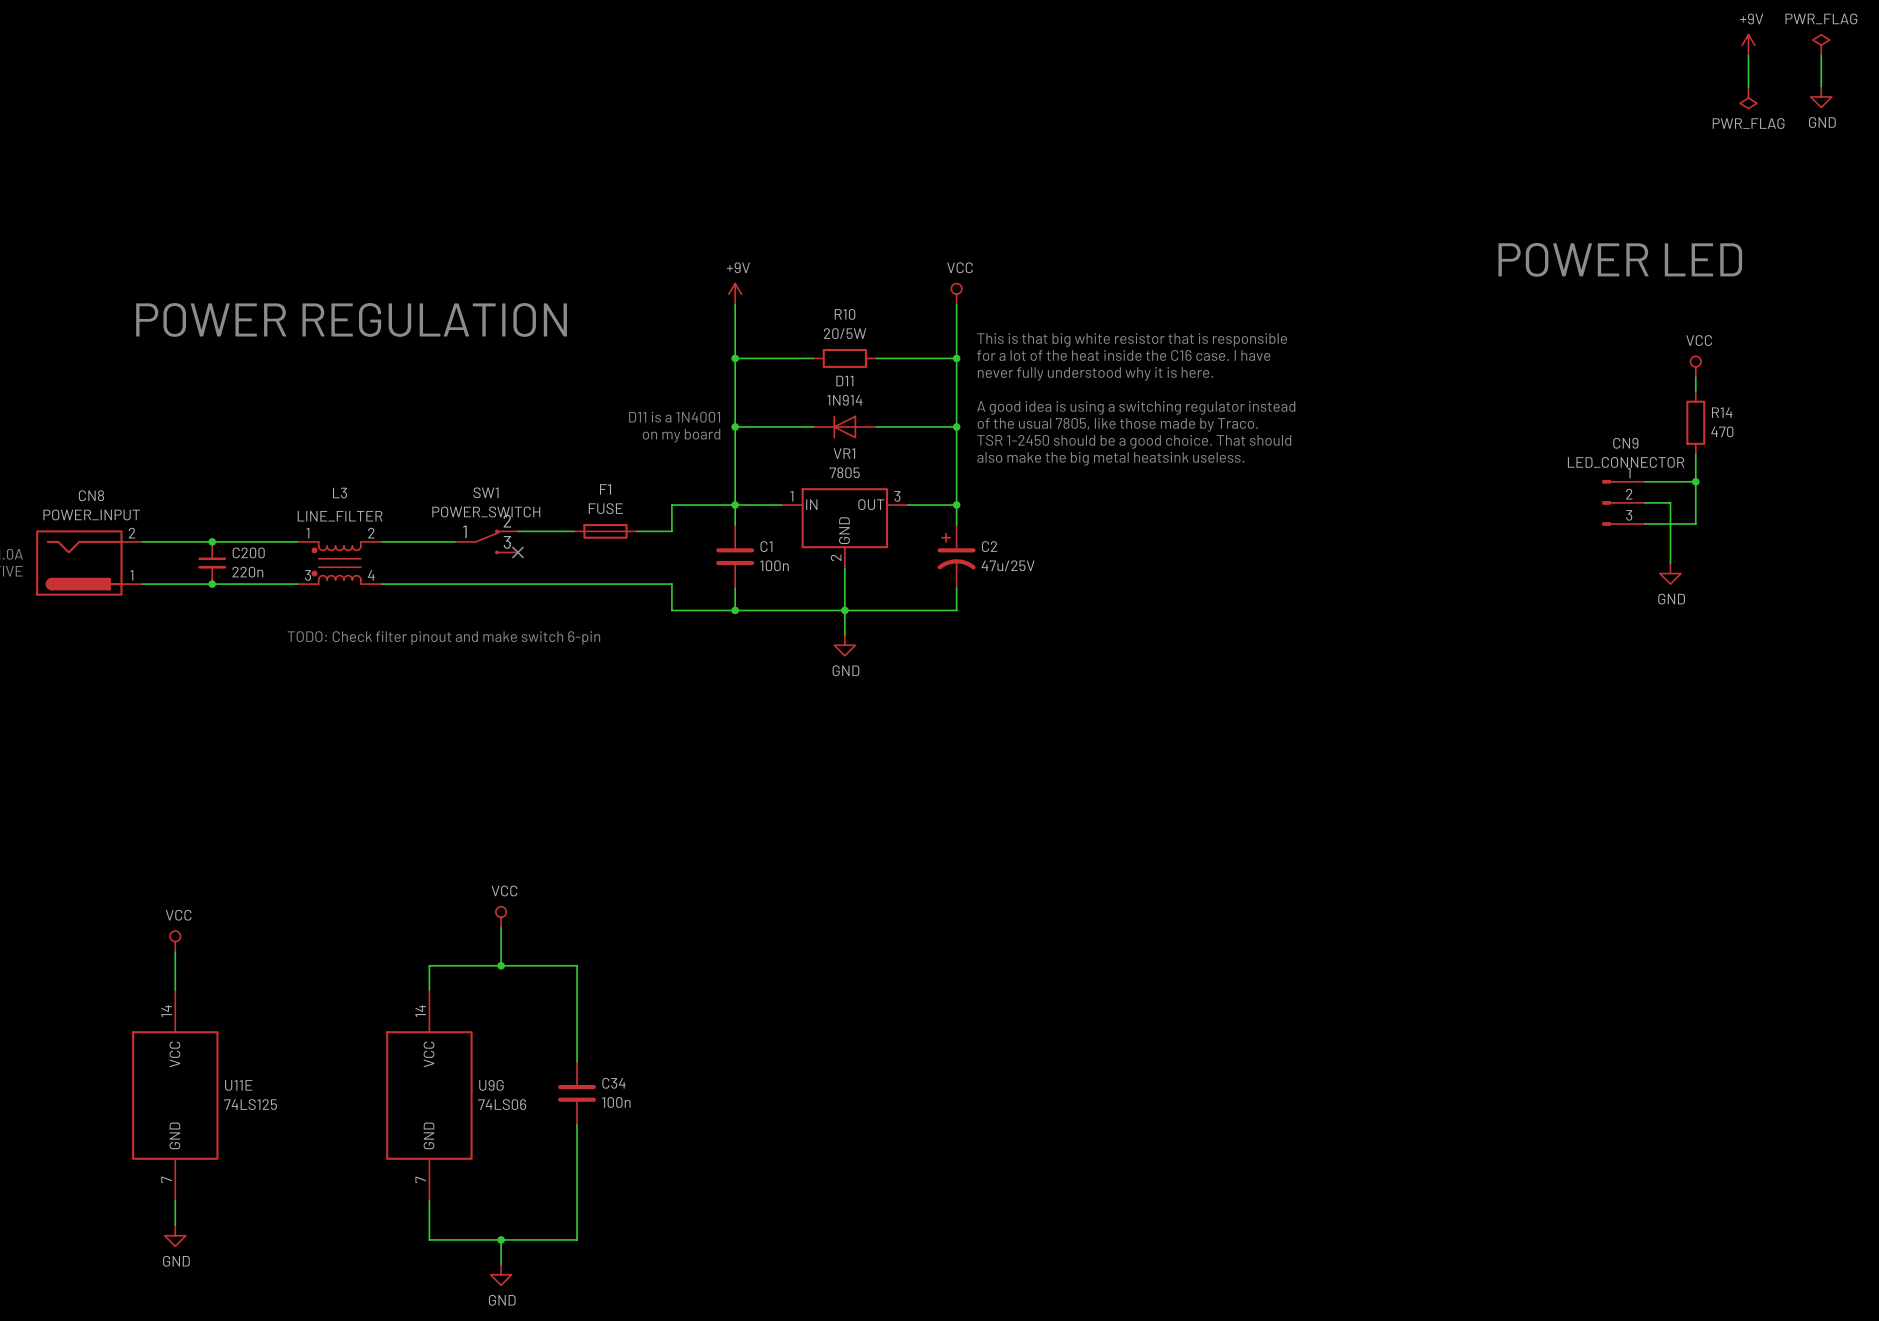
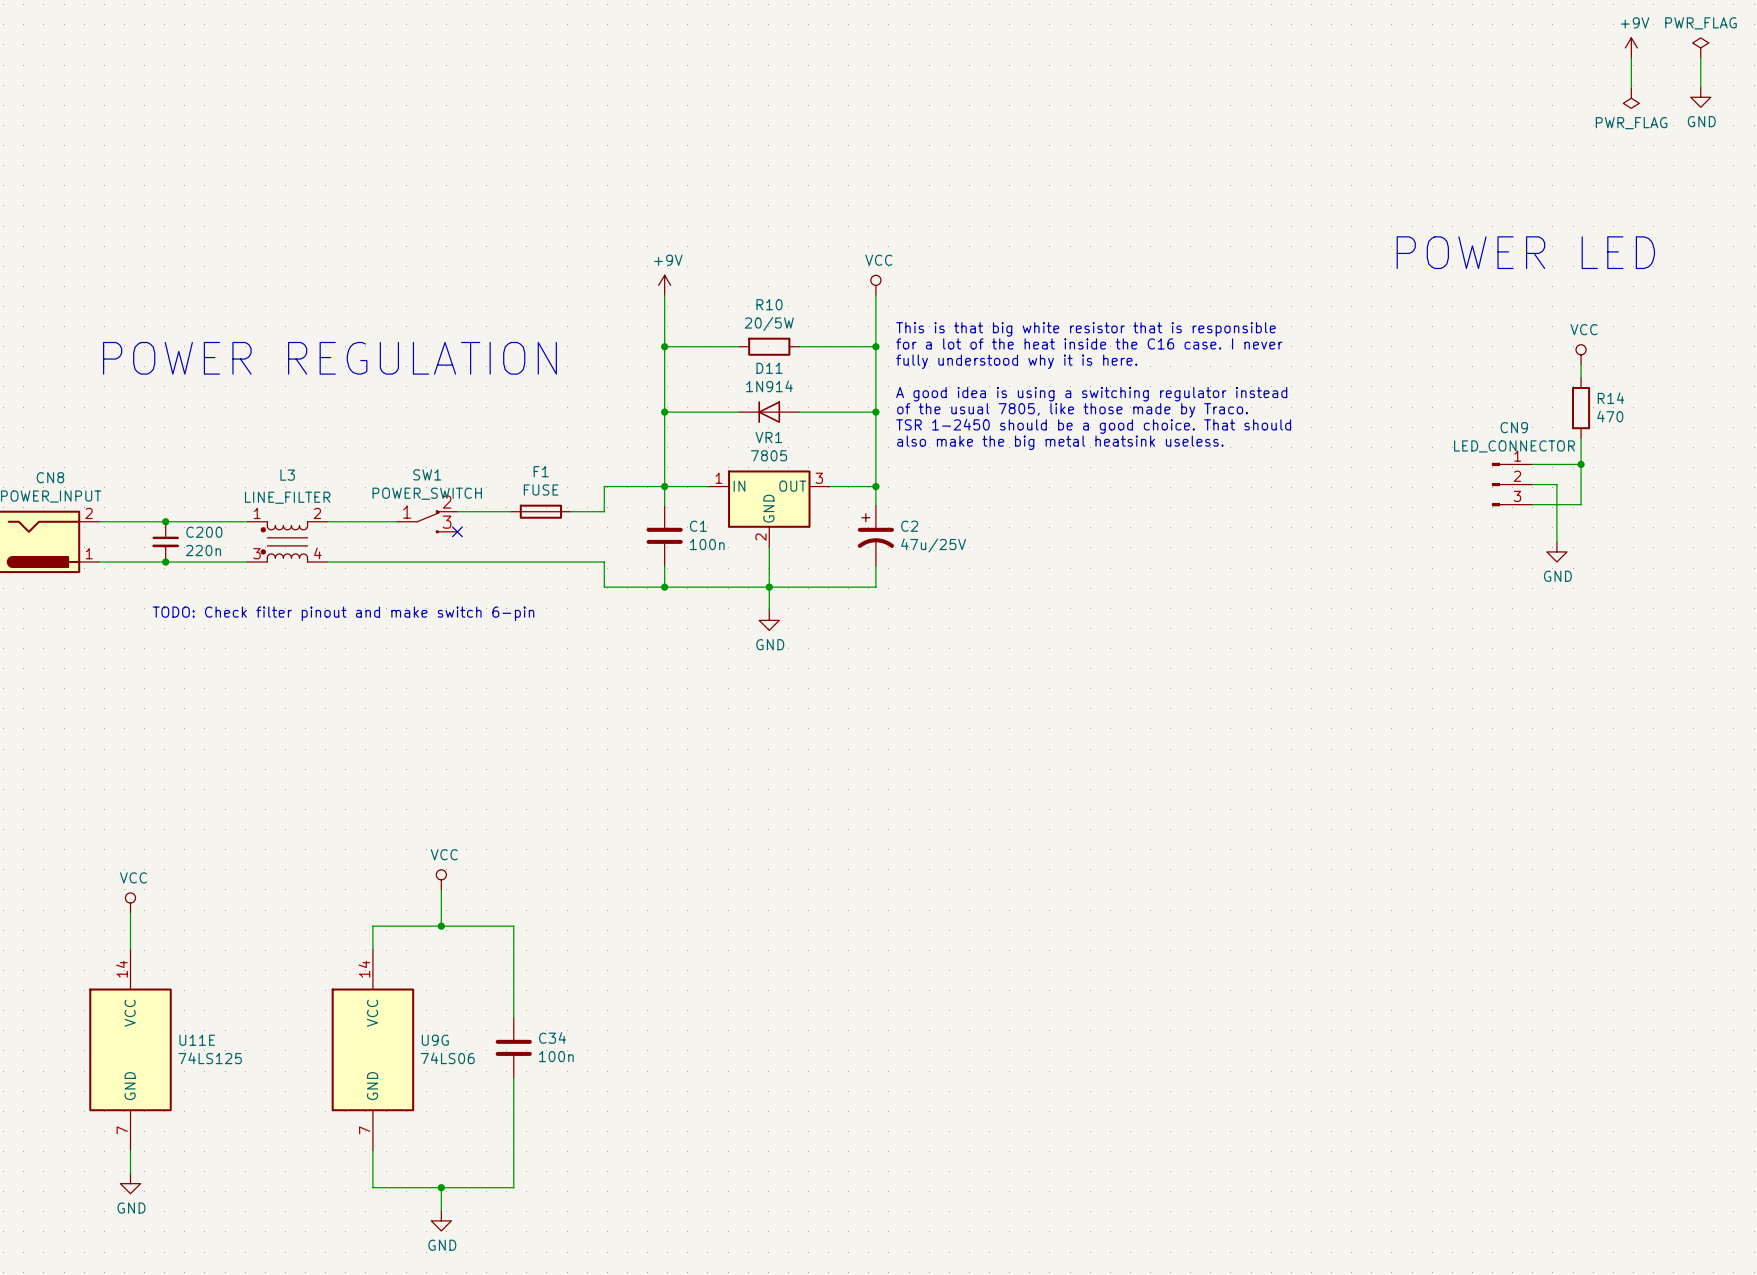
text position: POWER REGULATION (351, 319) -> POWER REGULATION (329, 358)
text: for a lot of the heat inside the C16 case. I have (1123, 355) -> for a lot of the heat inside the C16 case. I never (1089, 343)
text: never fully understood why it is here. (1095, 373) -> fully understood why it is here. (1016, 361)
text: D11 is a 1N4001 (674, 417) -> none
text: on my board (681, 435) -> none

